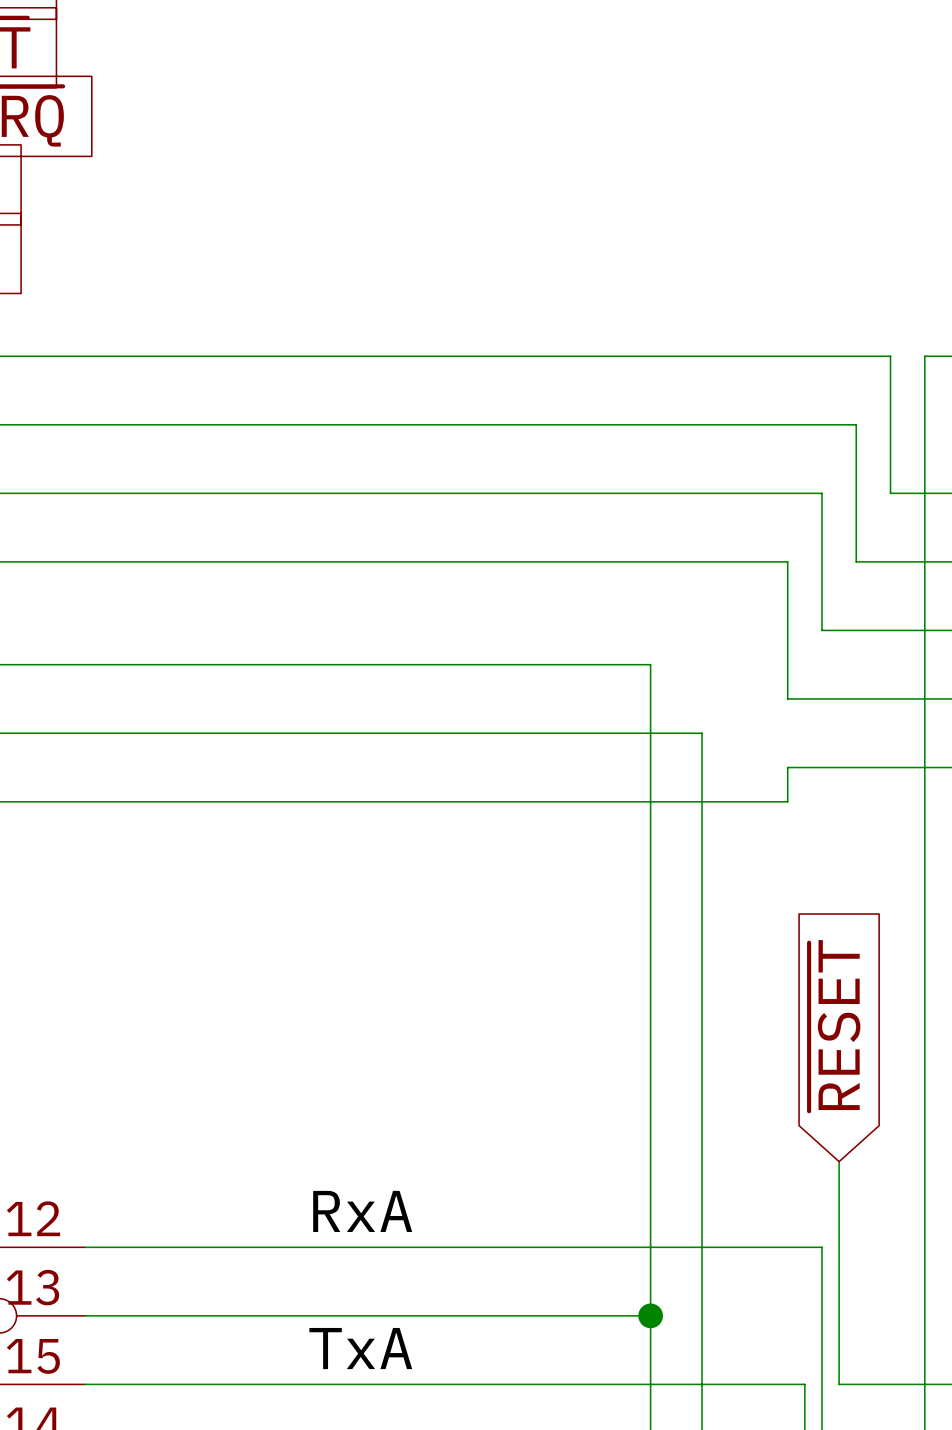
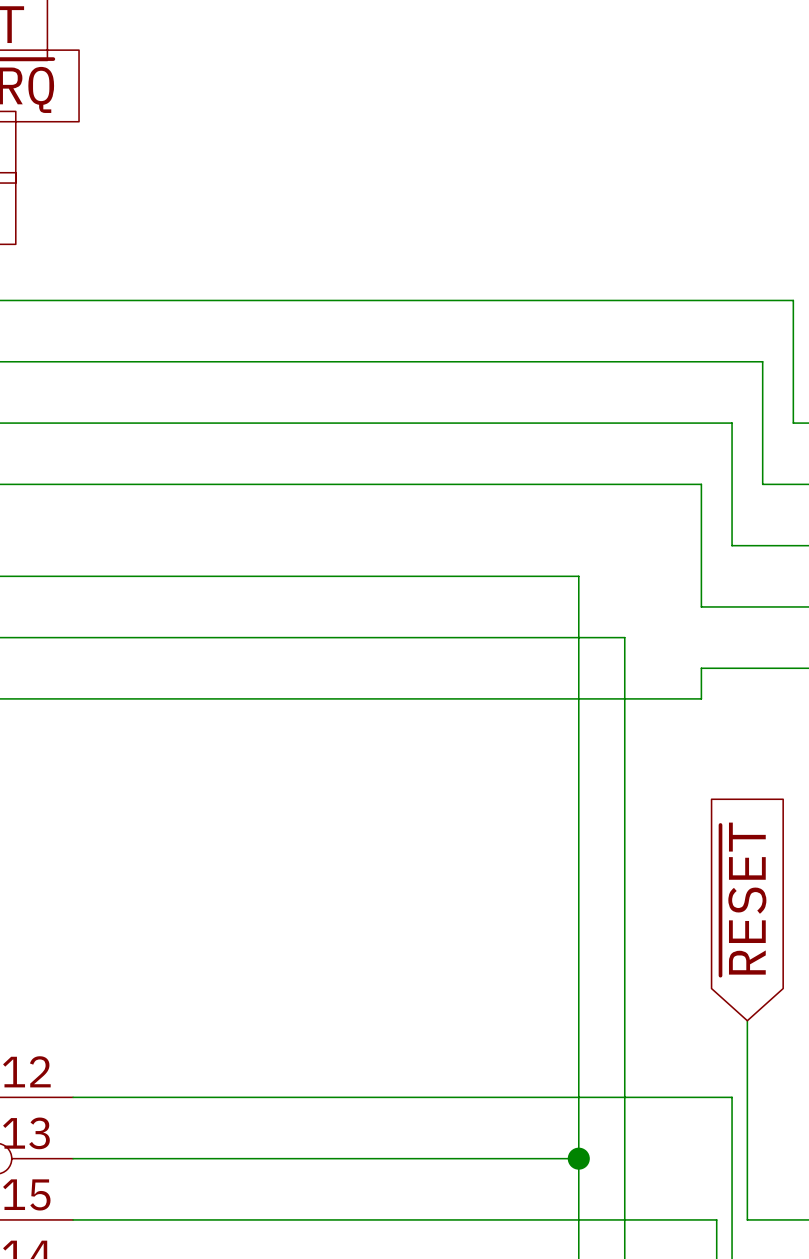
label: RxA (362, 1211) -> none
label: TxA (360, 1348) -> none

